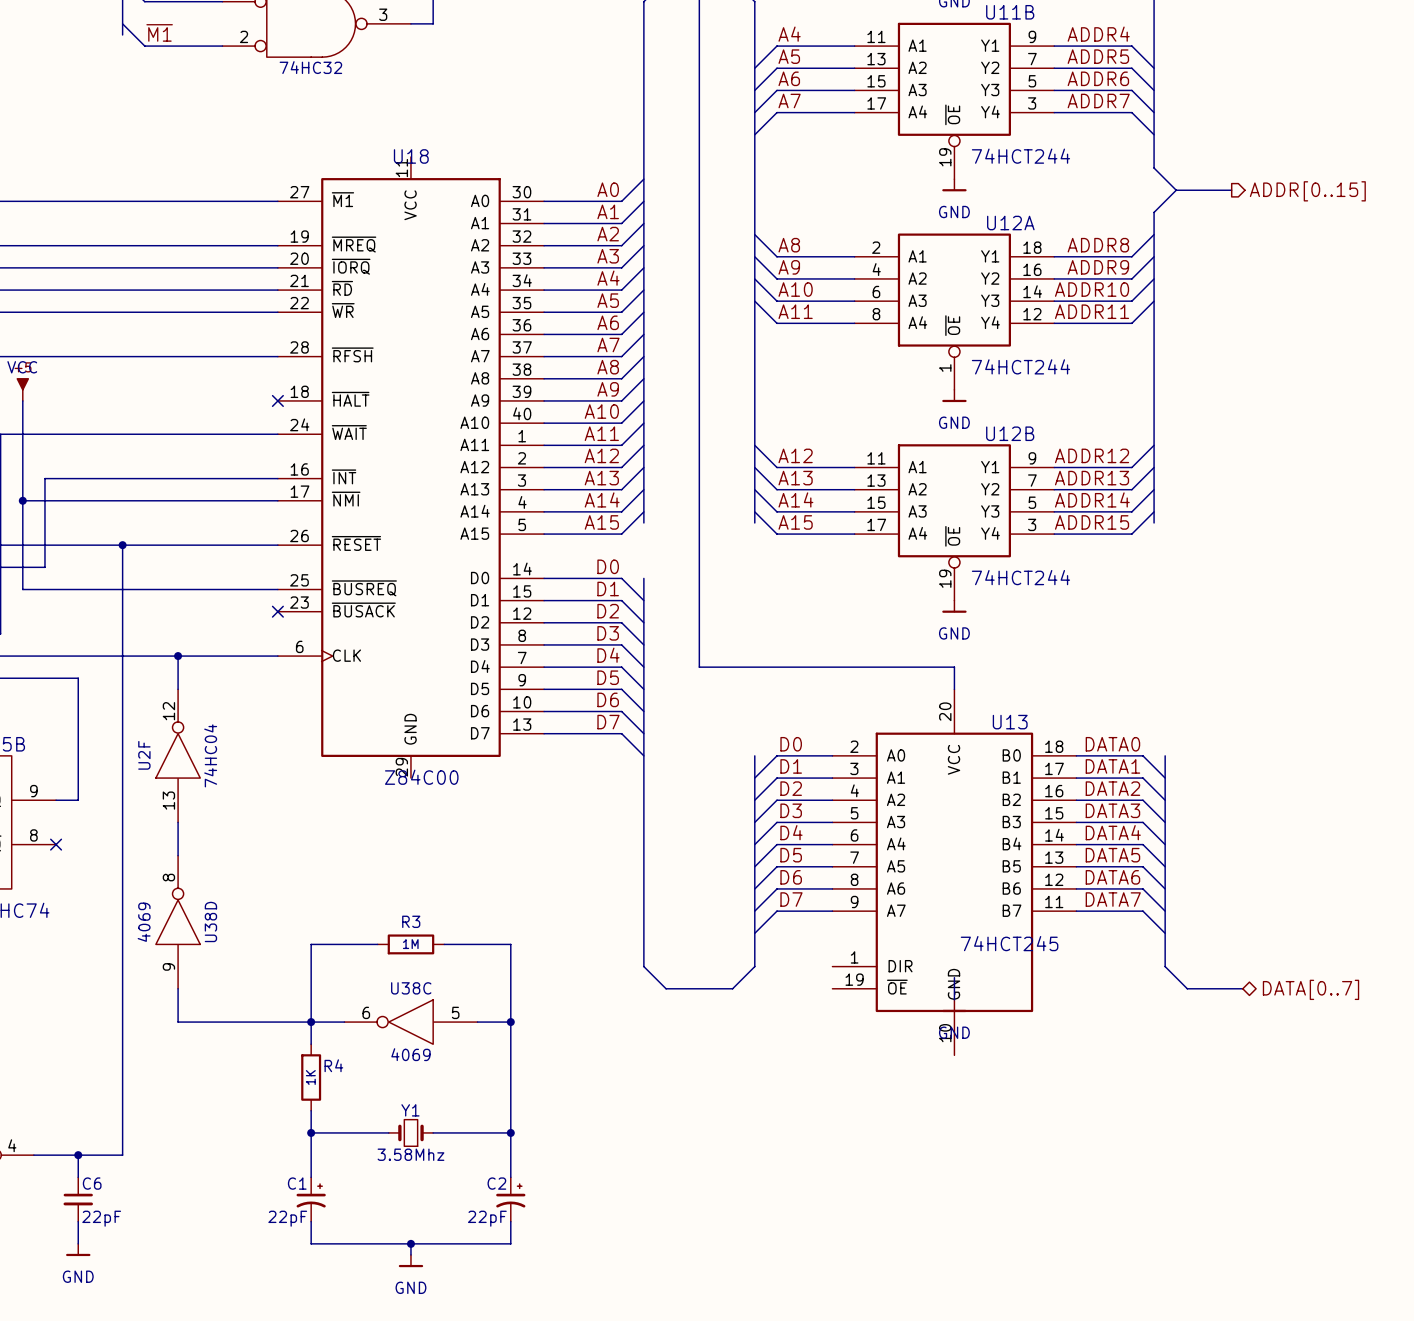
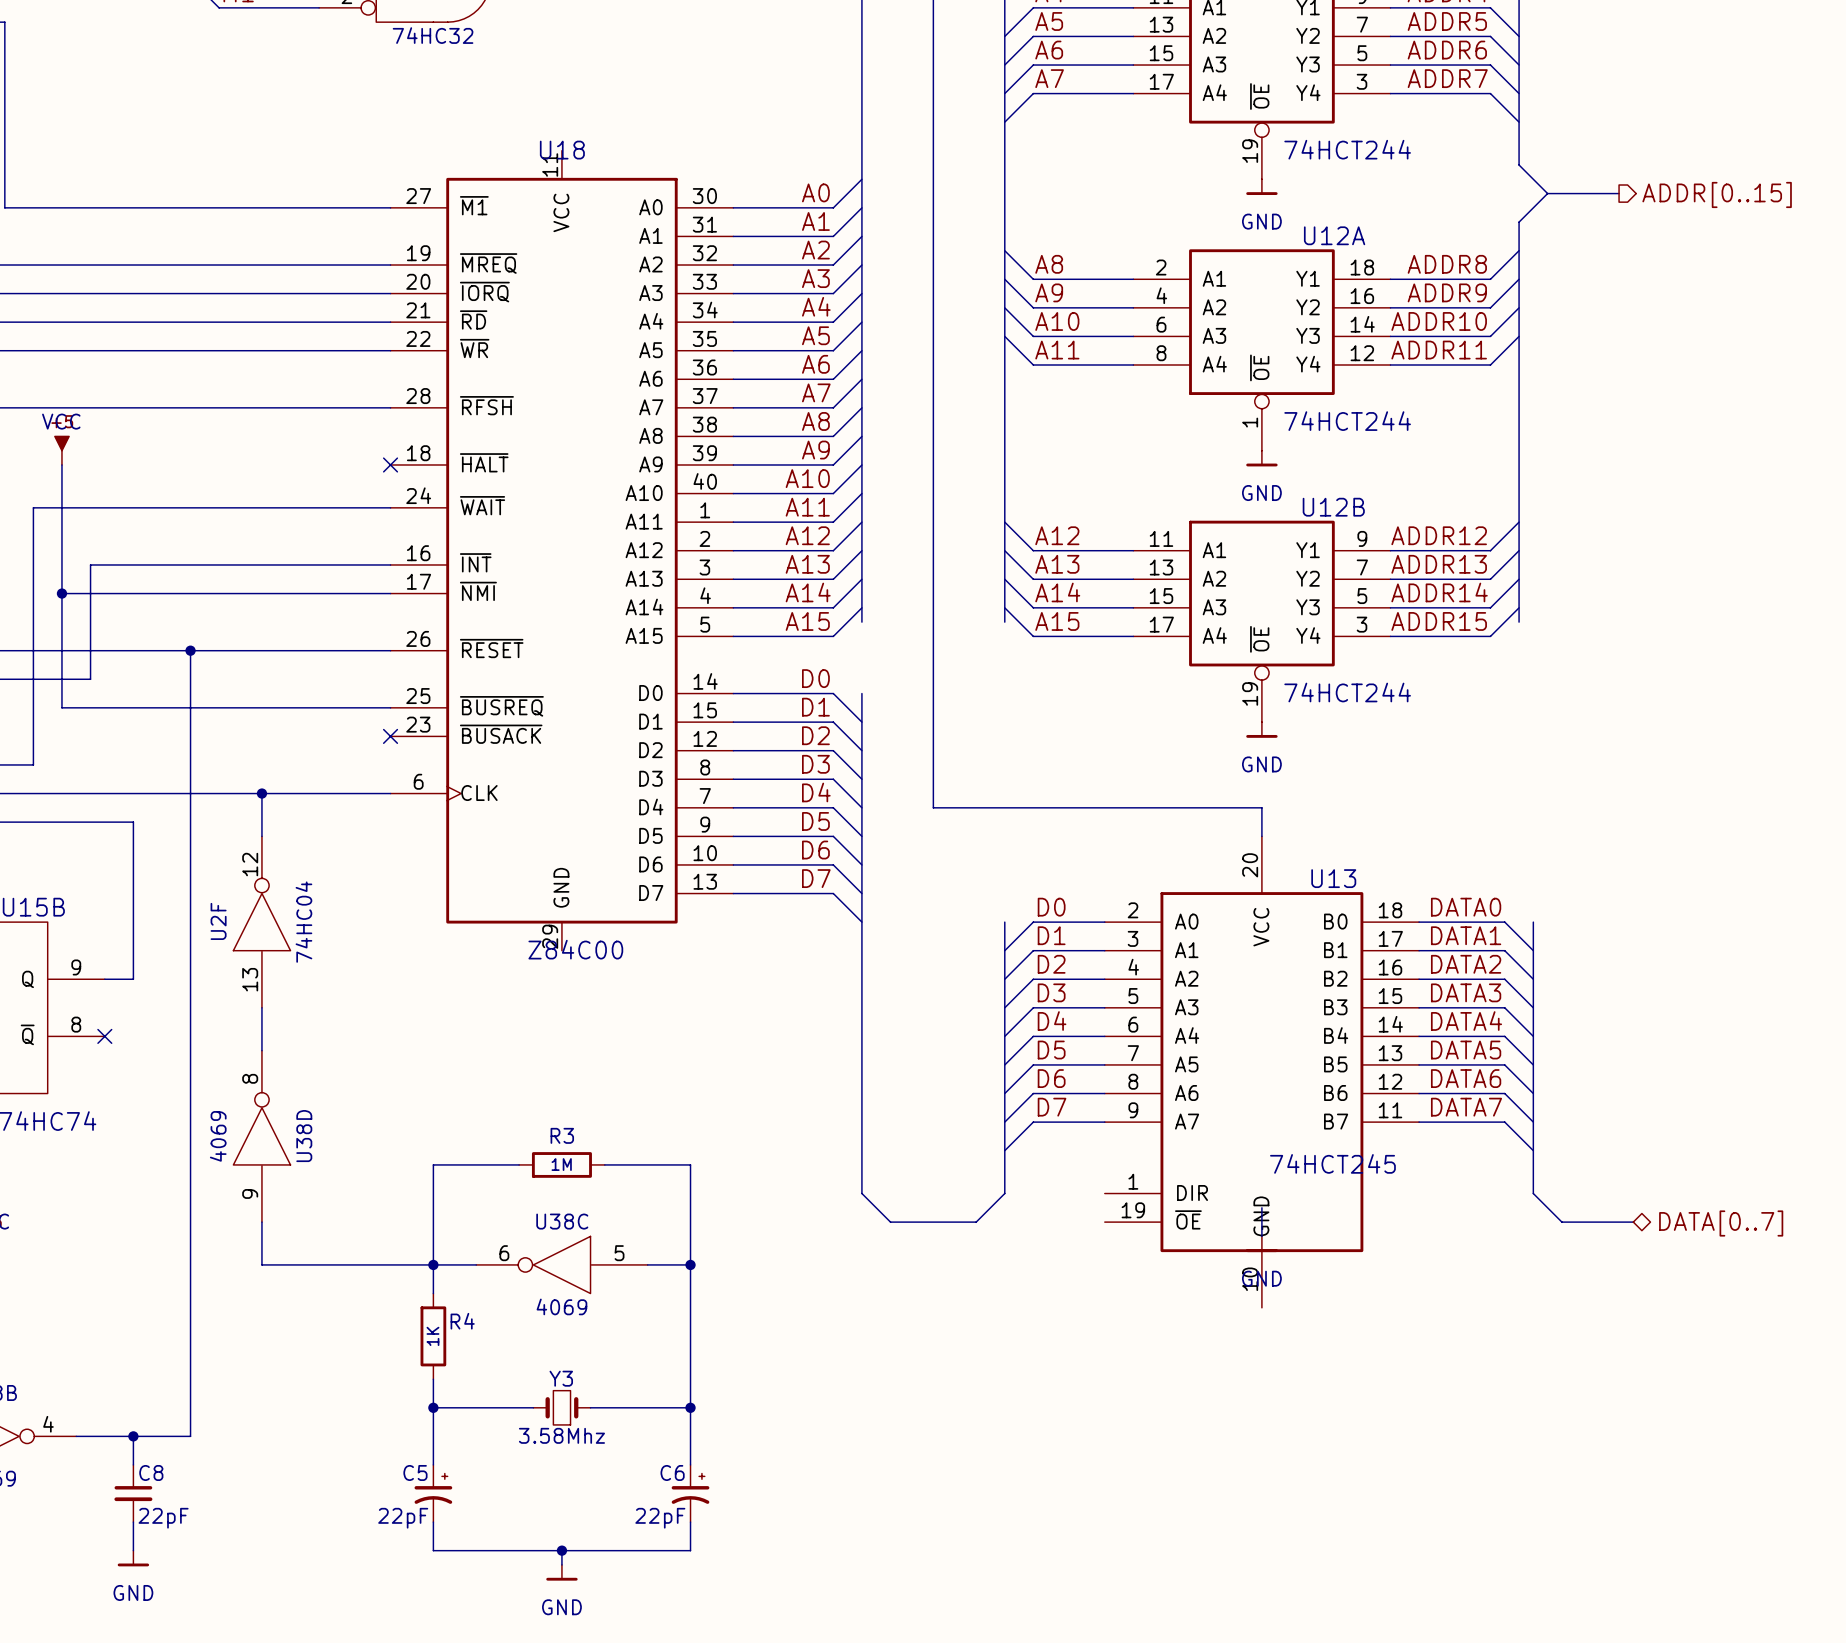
Y1 name: Y1 (410, 1110) -> Y3 (561, 1378)
C6 name: C6 (92, 1183) -> C8 (151, 1472)
C1 name: C1 (297, 1183) -> C5 (415, 1472)
C2 name: C2 (496, 1183) -> C6 (672, 1472)

